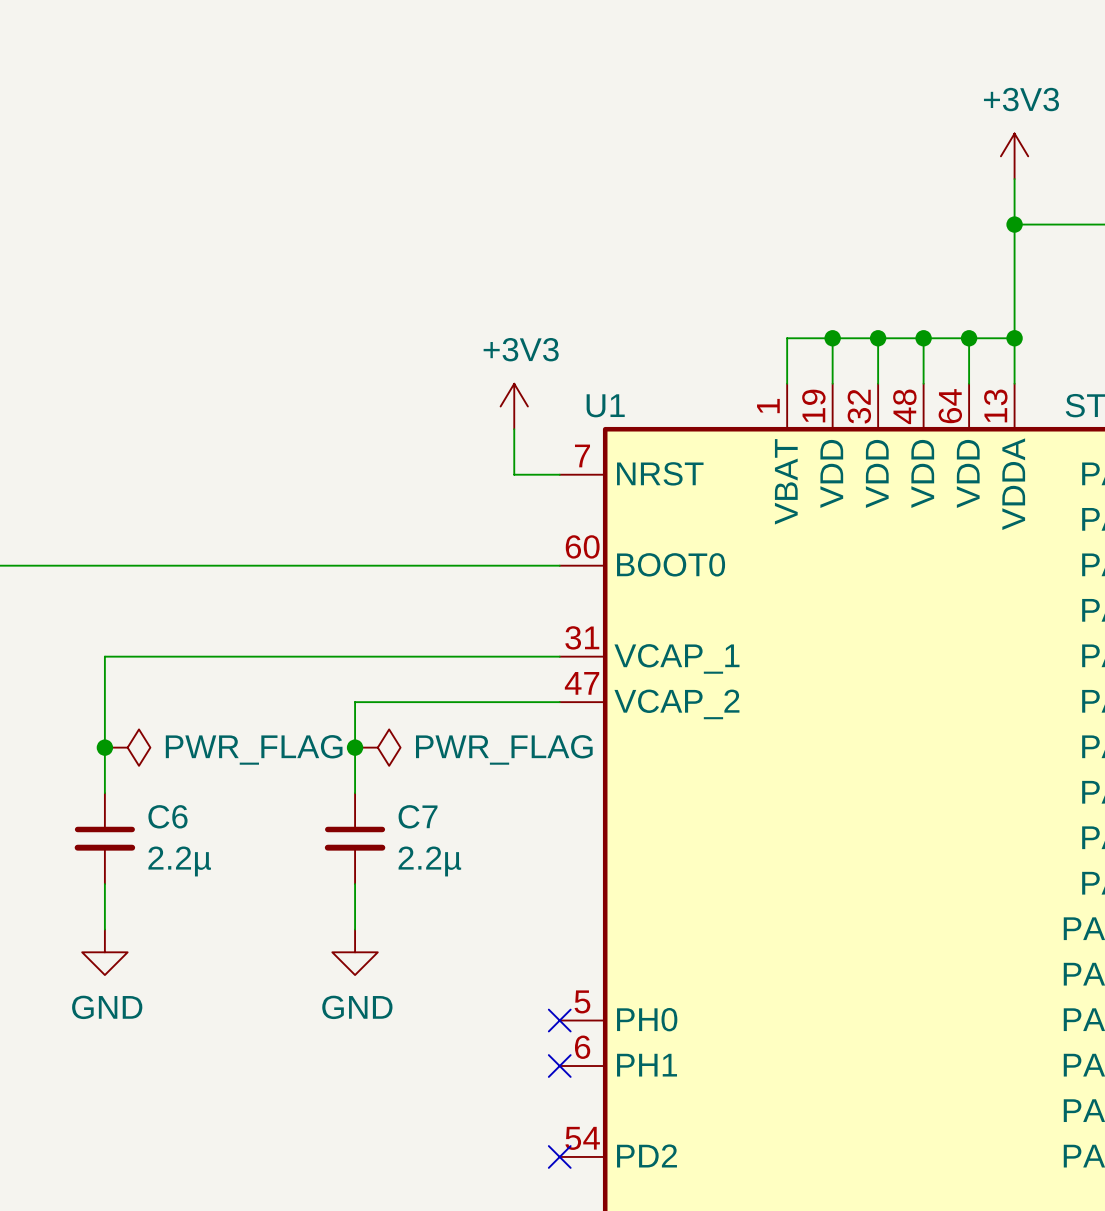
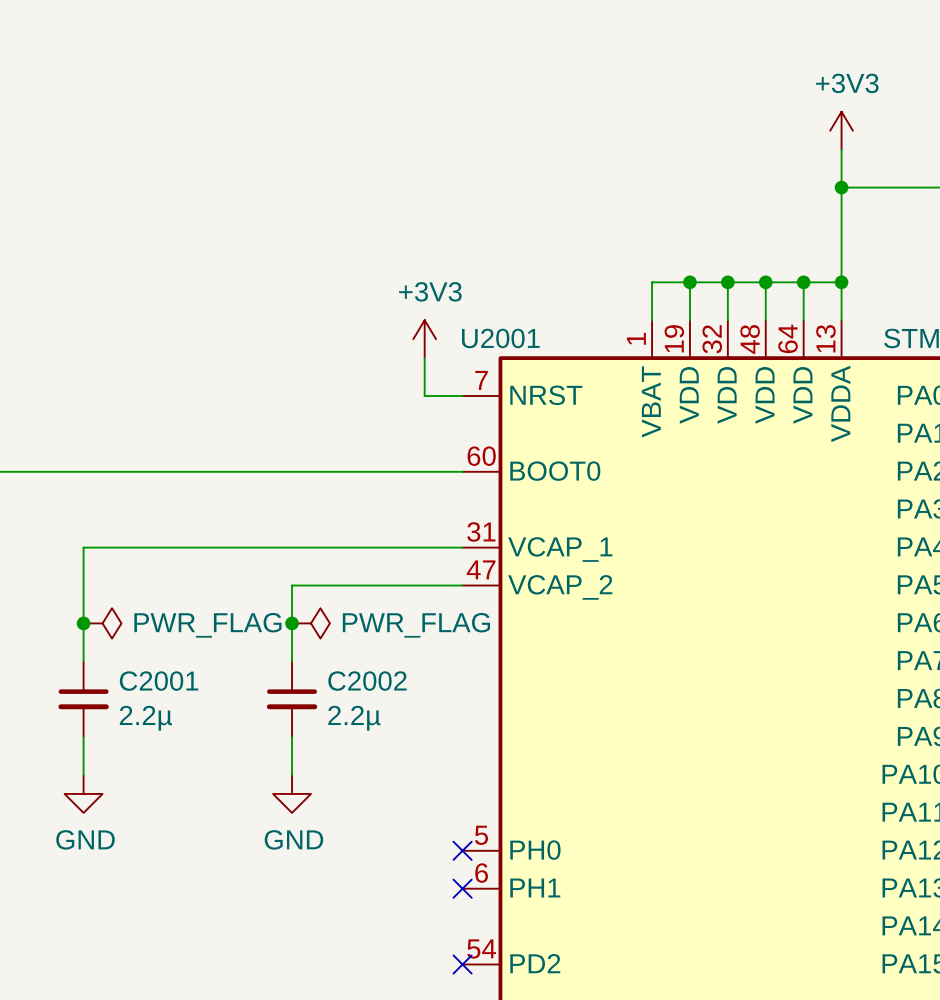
U1 name: U1 (605, 405) -> U2001 (500, 338)
C6 name: C6 (167, 816) -> C2001 (159, 681)
C7 name: C7 (418, 816) -> C2002 (367, 681)

